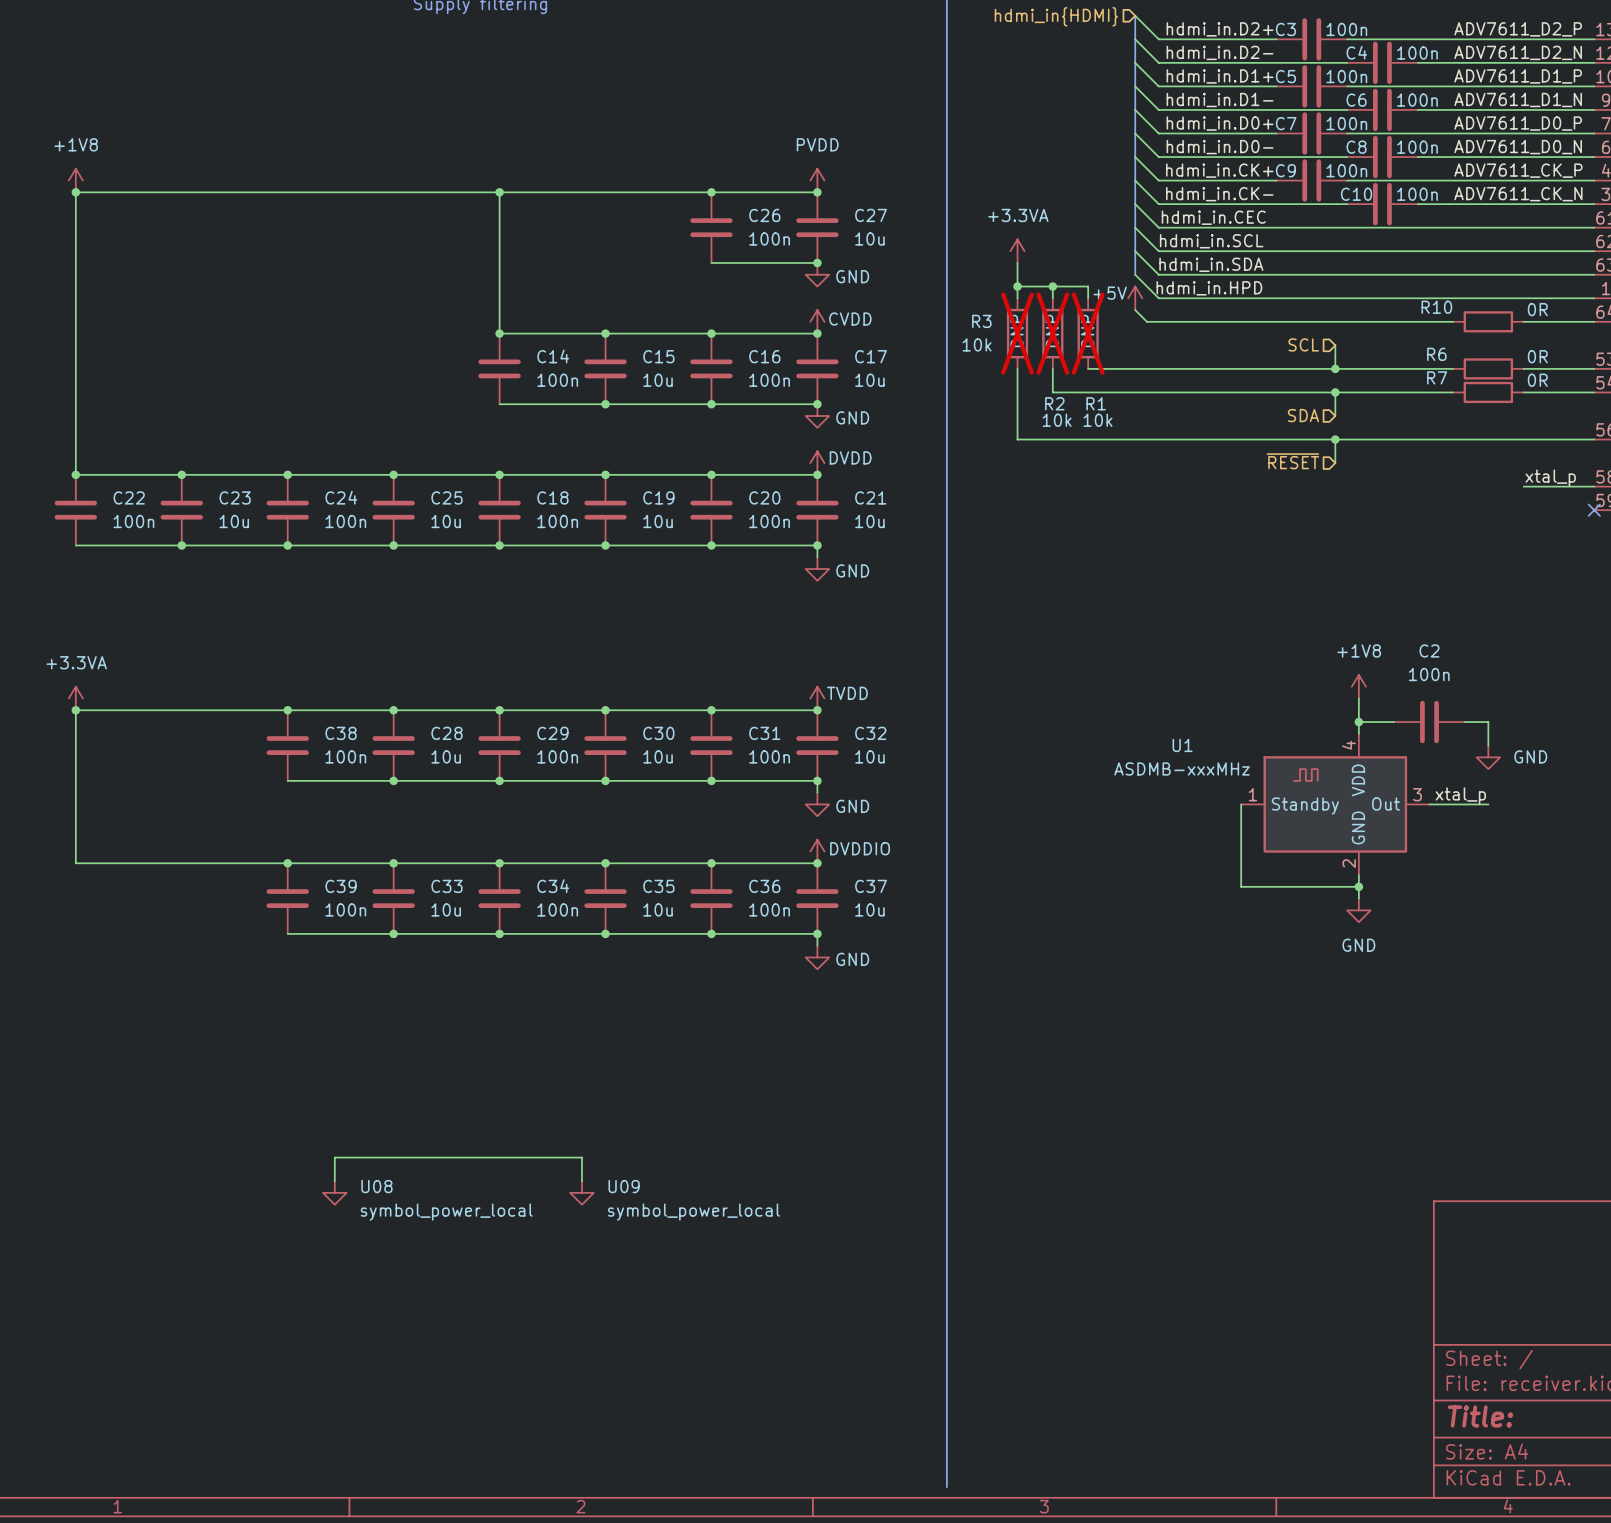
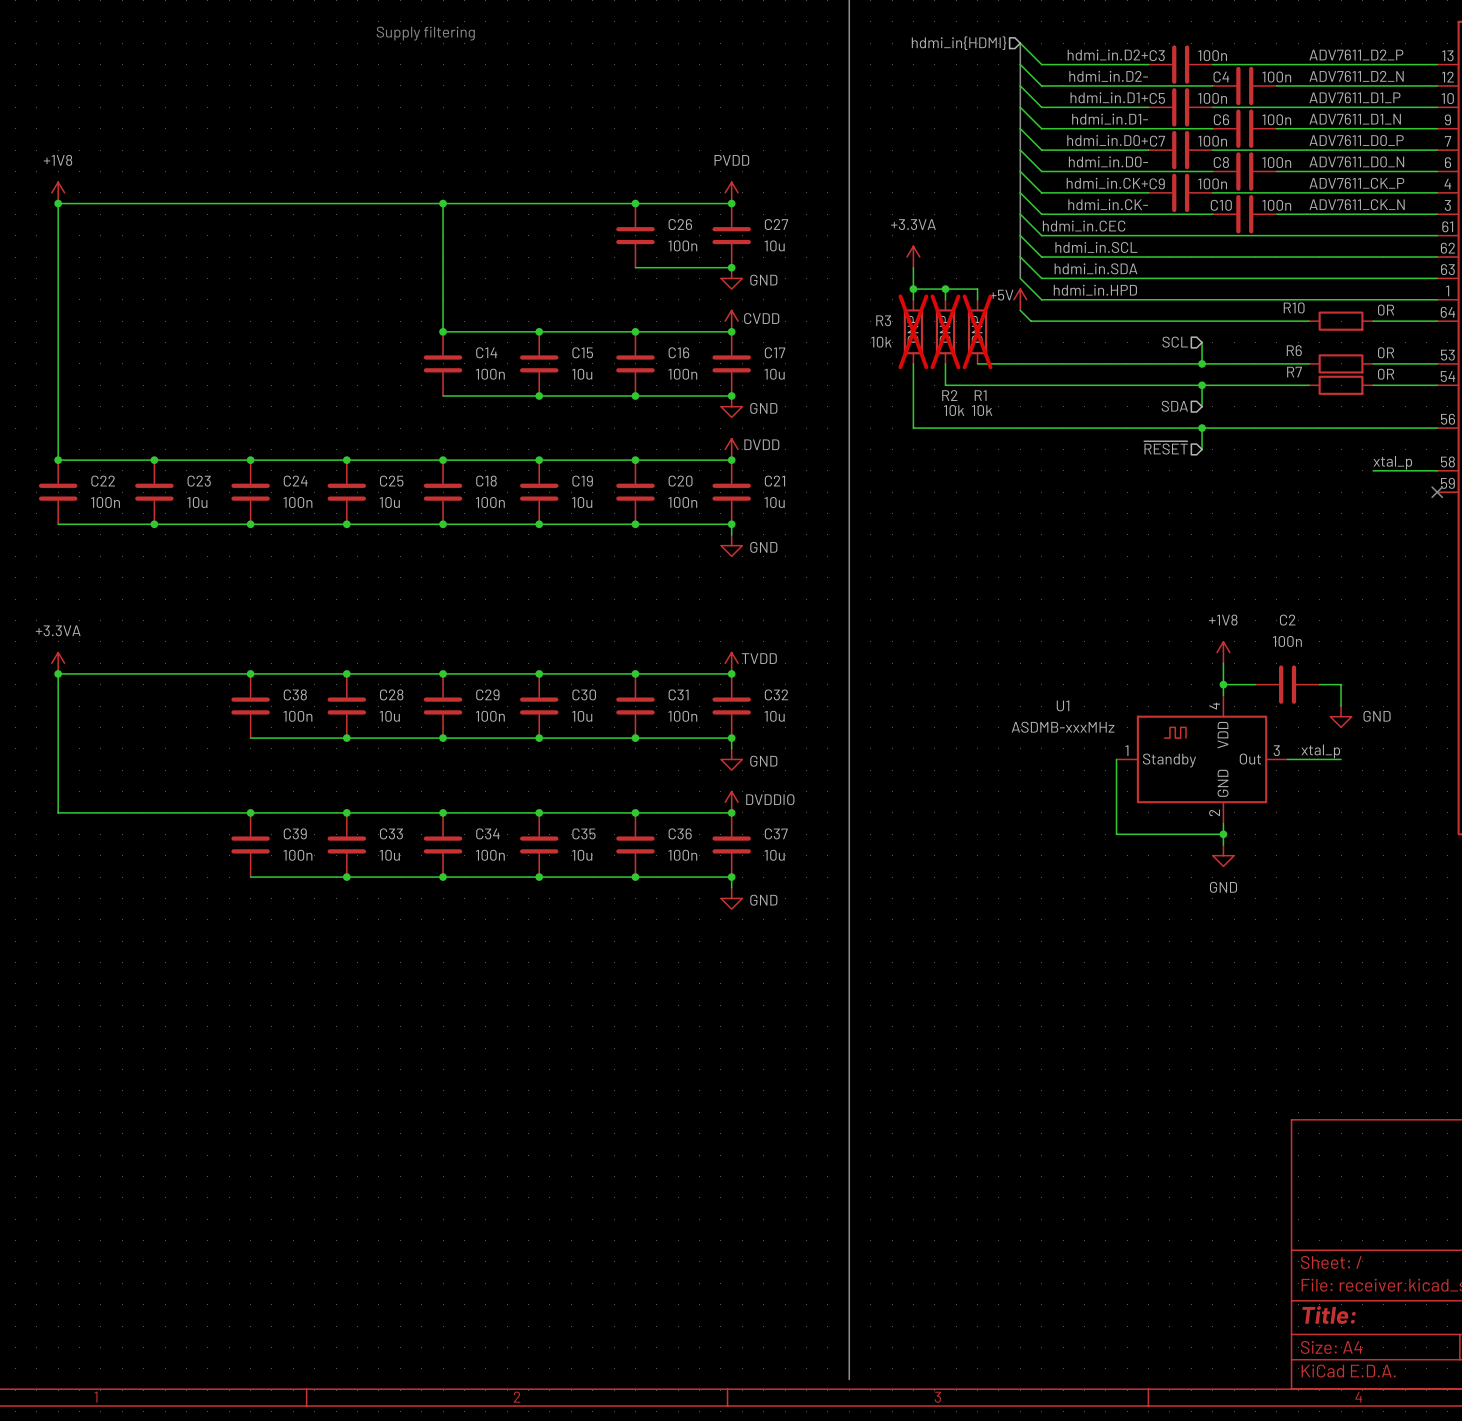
wire: (334, 1181) (334, 1157) (581, 1157) (581, 1181) -> none
U08: symbol_power_local (334, 1192) -> none
U09: symbol_power_local (581, 1192) -> none

